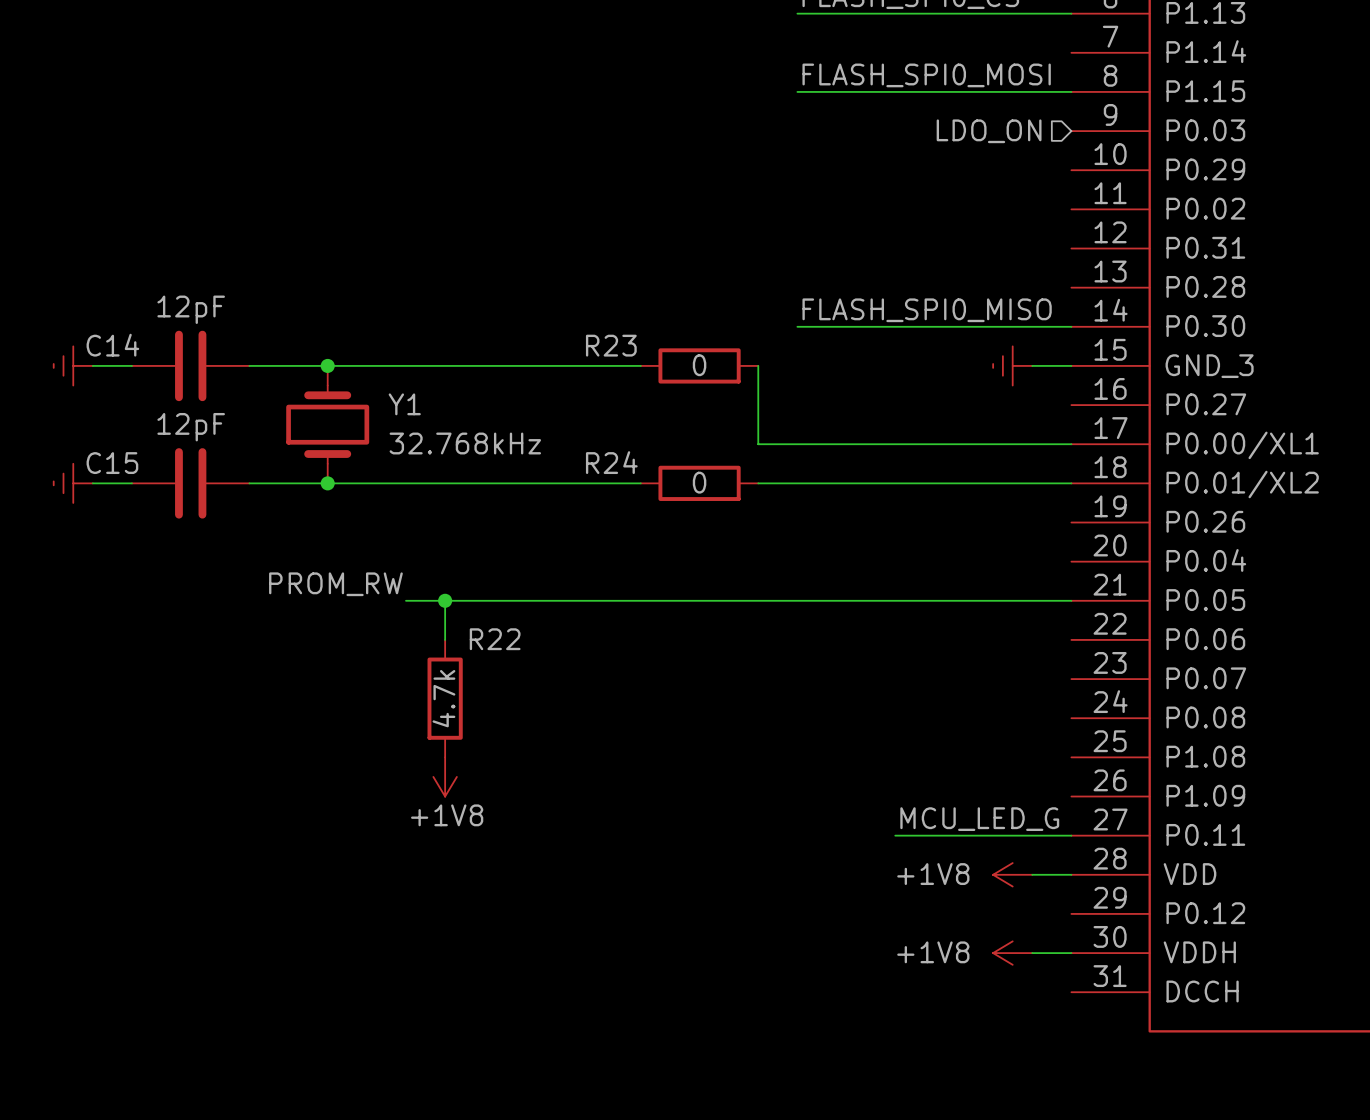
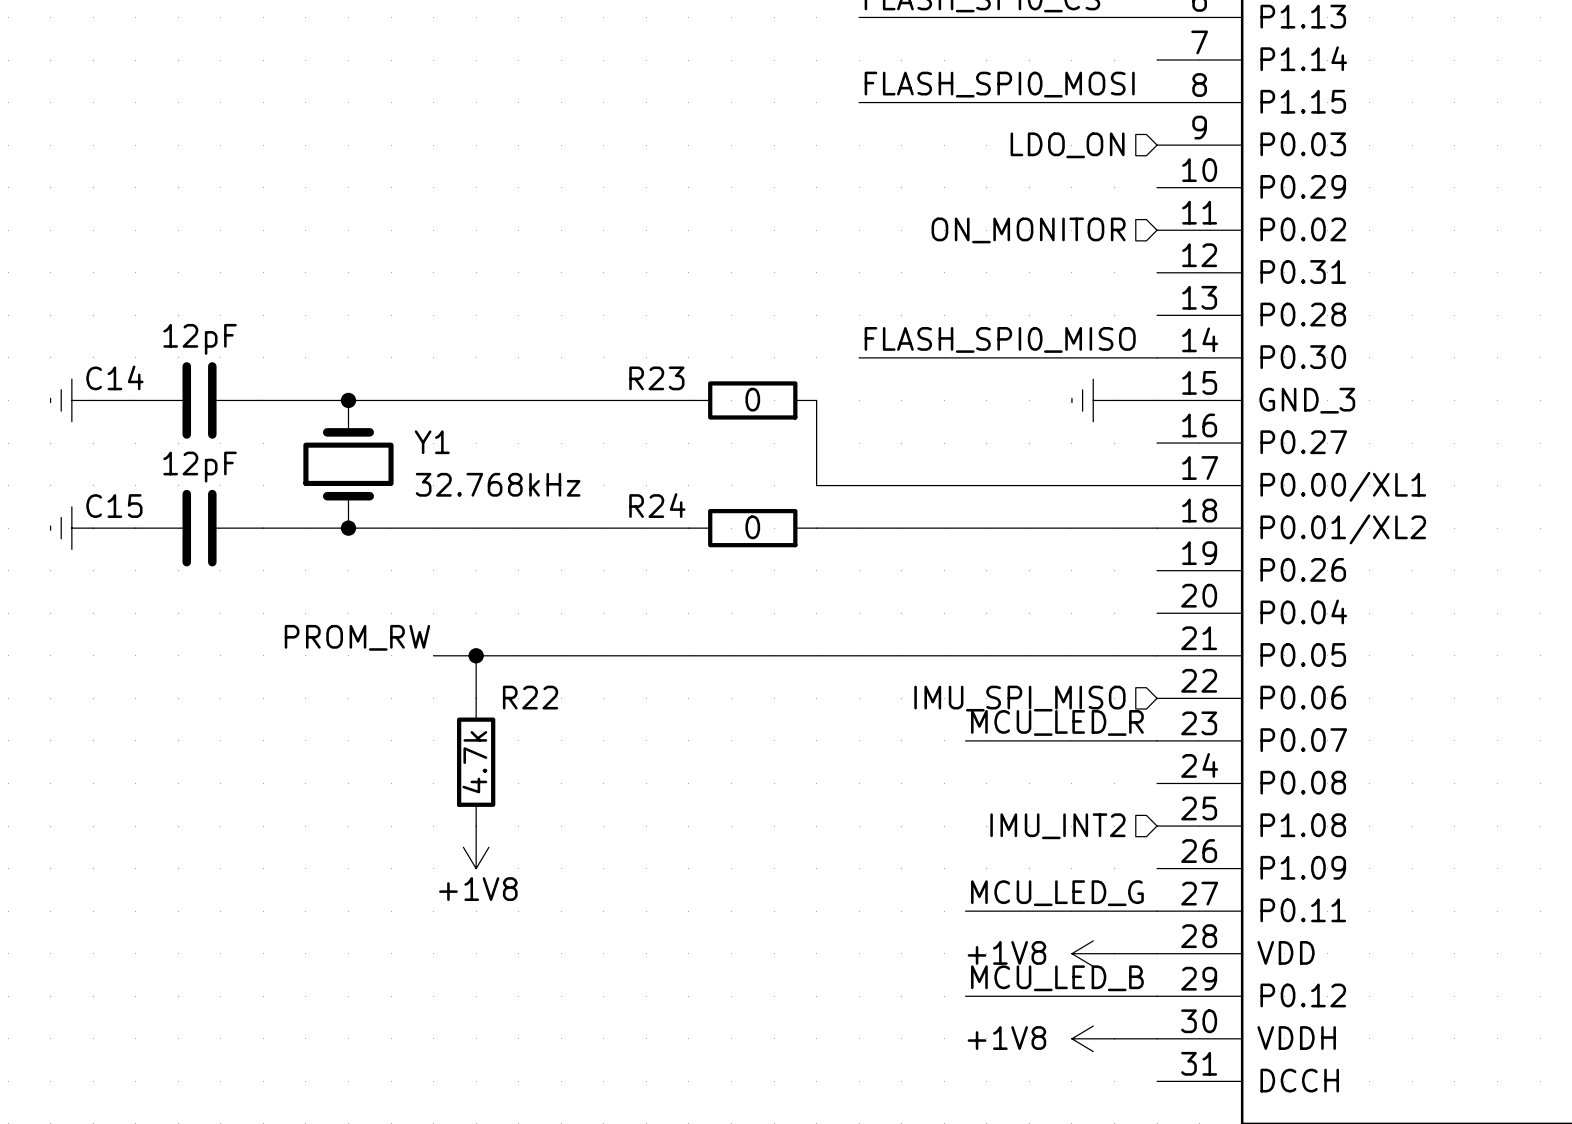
hierarchical label: none -> ON_MONITOR (1028, 230)
hierarchical label: none -> IMU_SPI_MISO (1019, 698)
label: none -> MCU_LED_R (1057, 722)
wire: none -> (965, 740) (1157, 740)
hierarchical label: none -> IMU_INT2 (1057, 826)
label: none -> MCU_LED_B (1057, 978)
wire: none -> (965, 996) (1157, 996)

